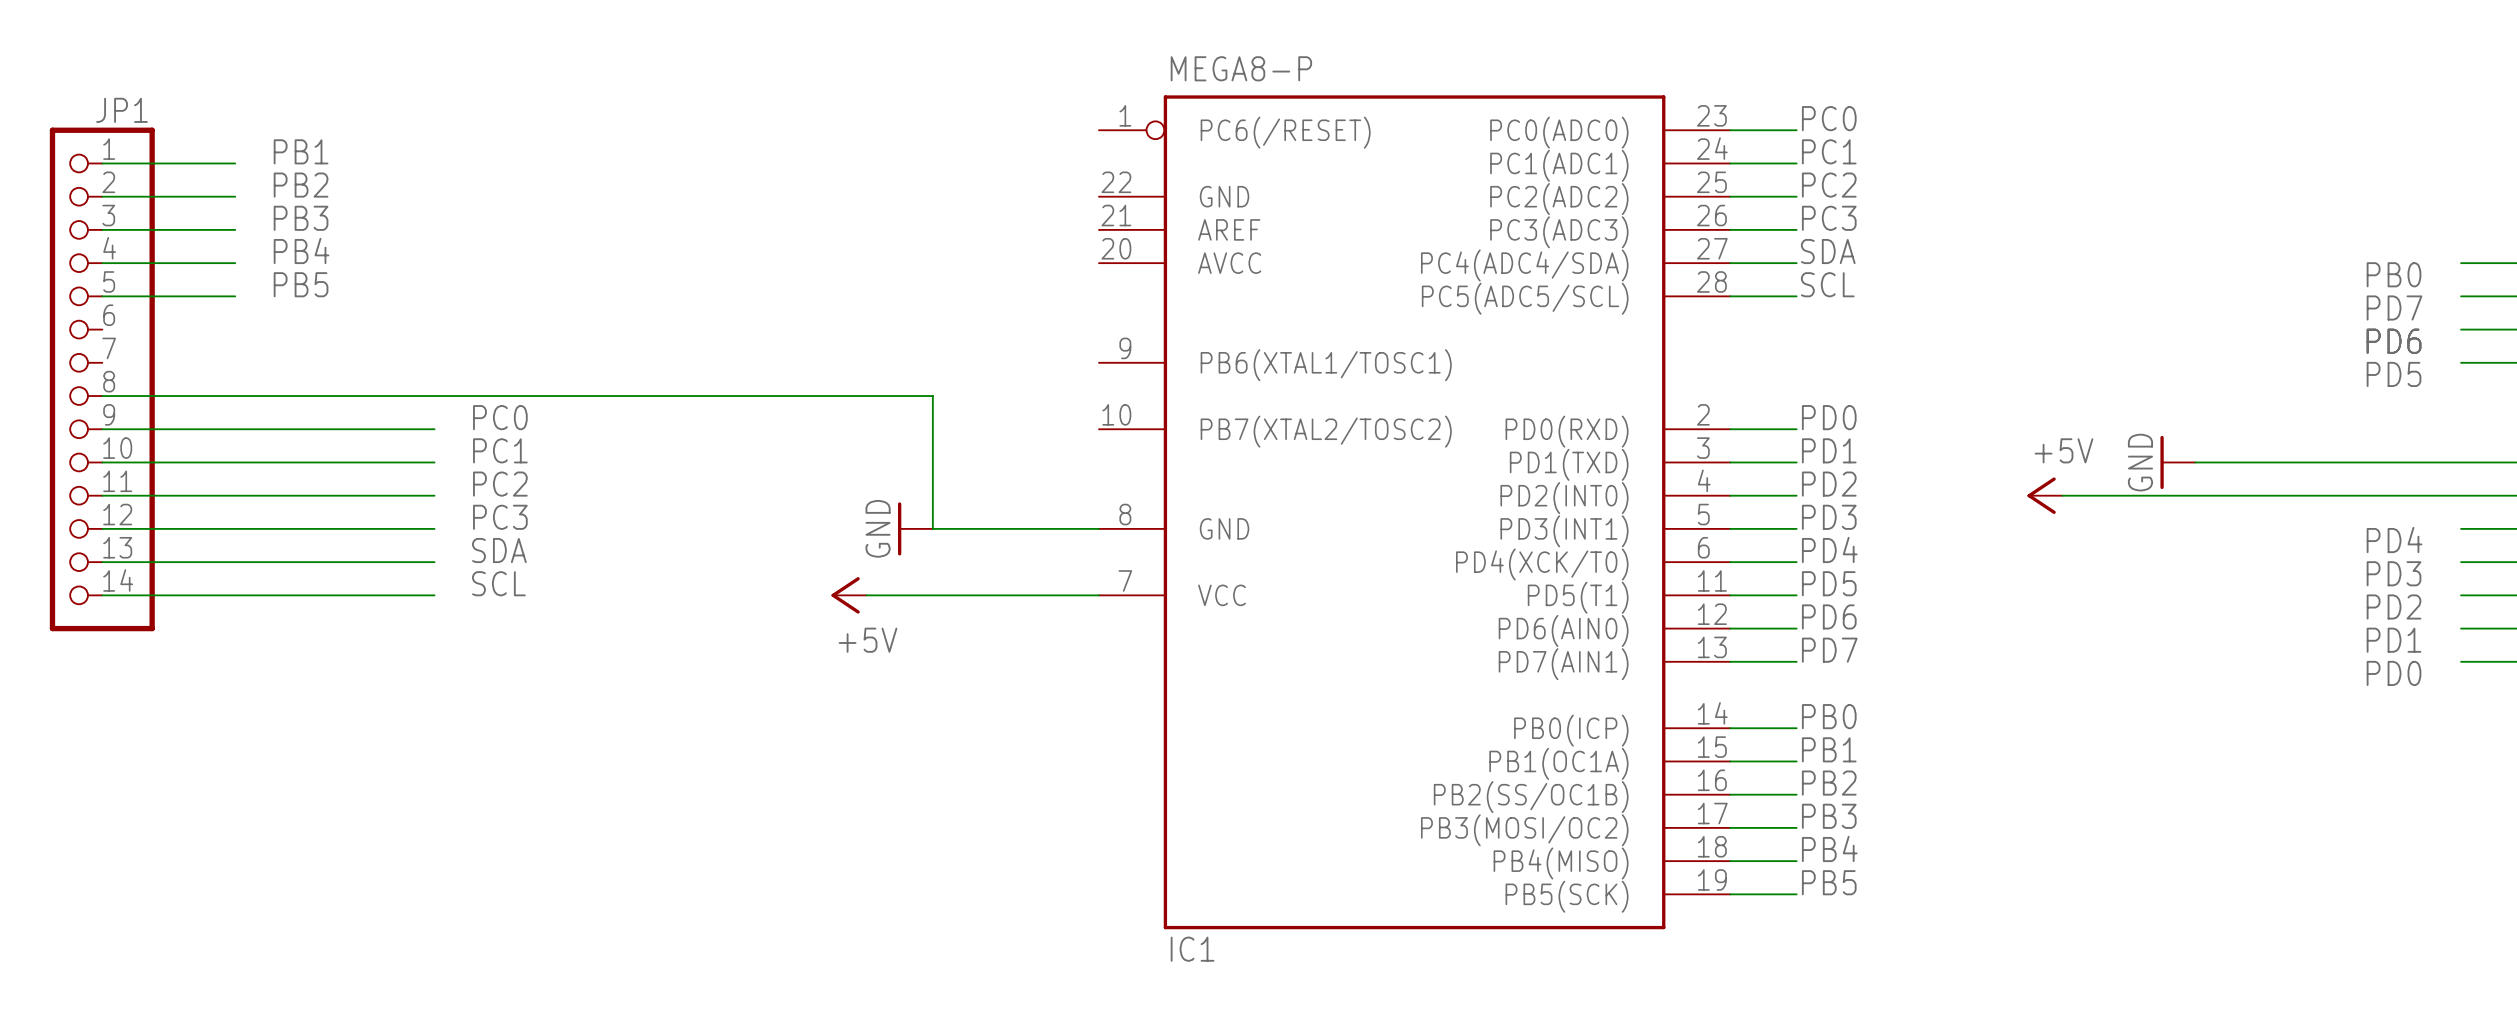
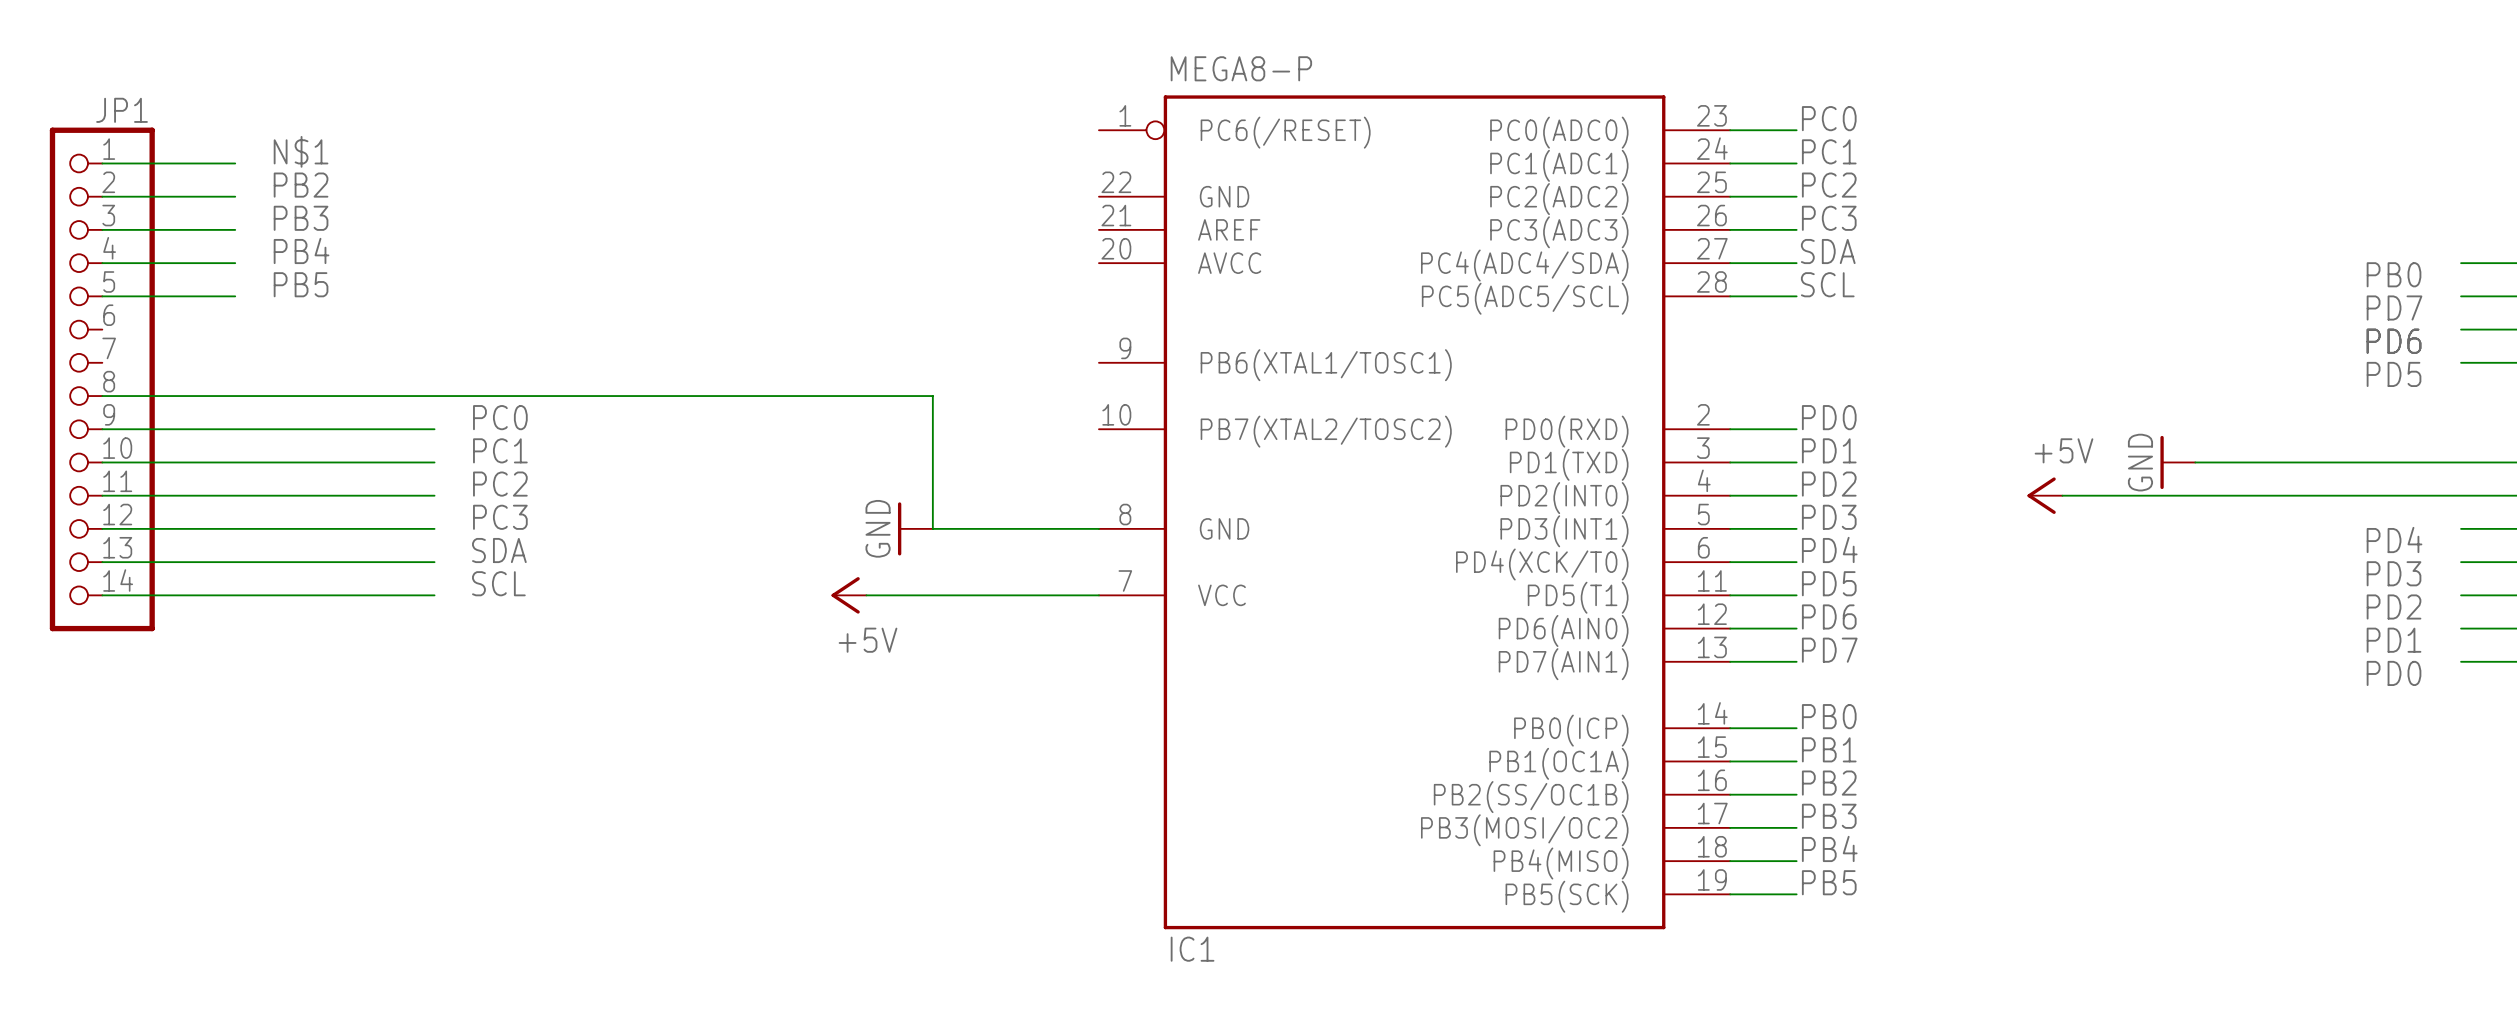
label: PB1 (301, 151) -> N$1 (301, 151)

